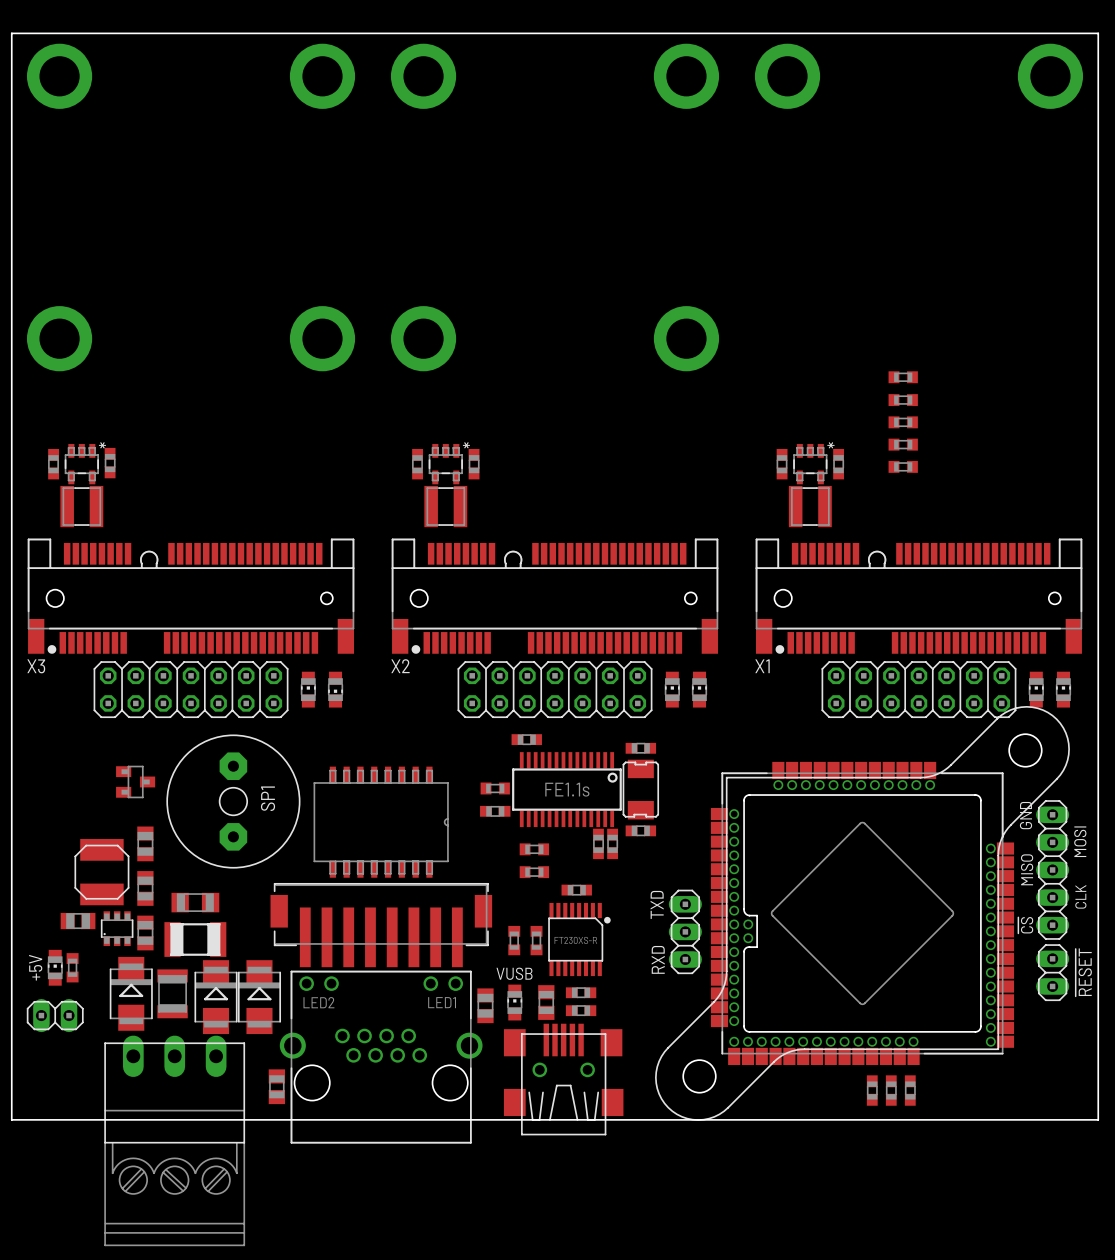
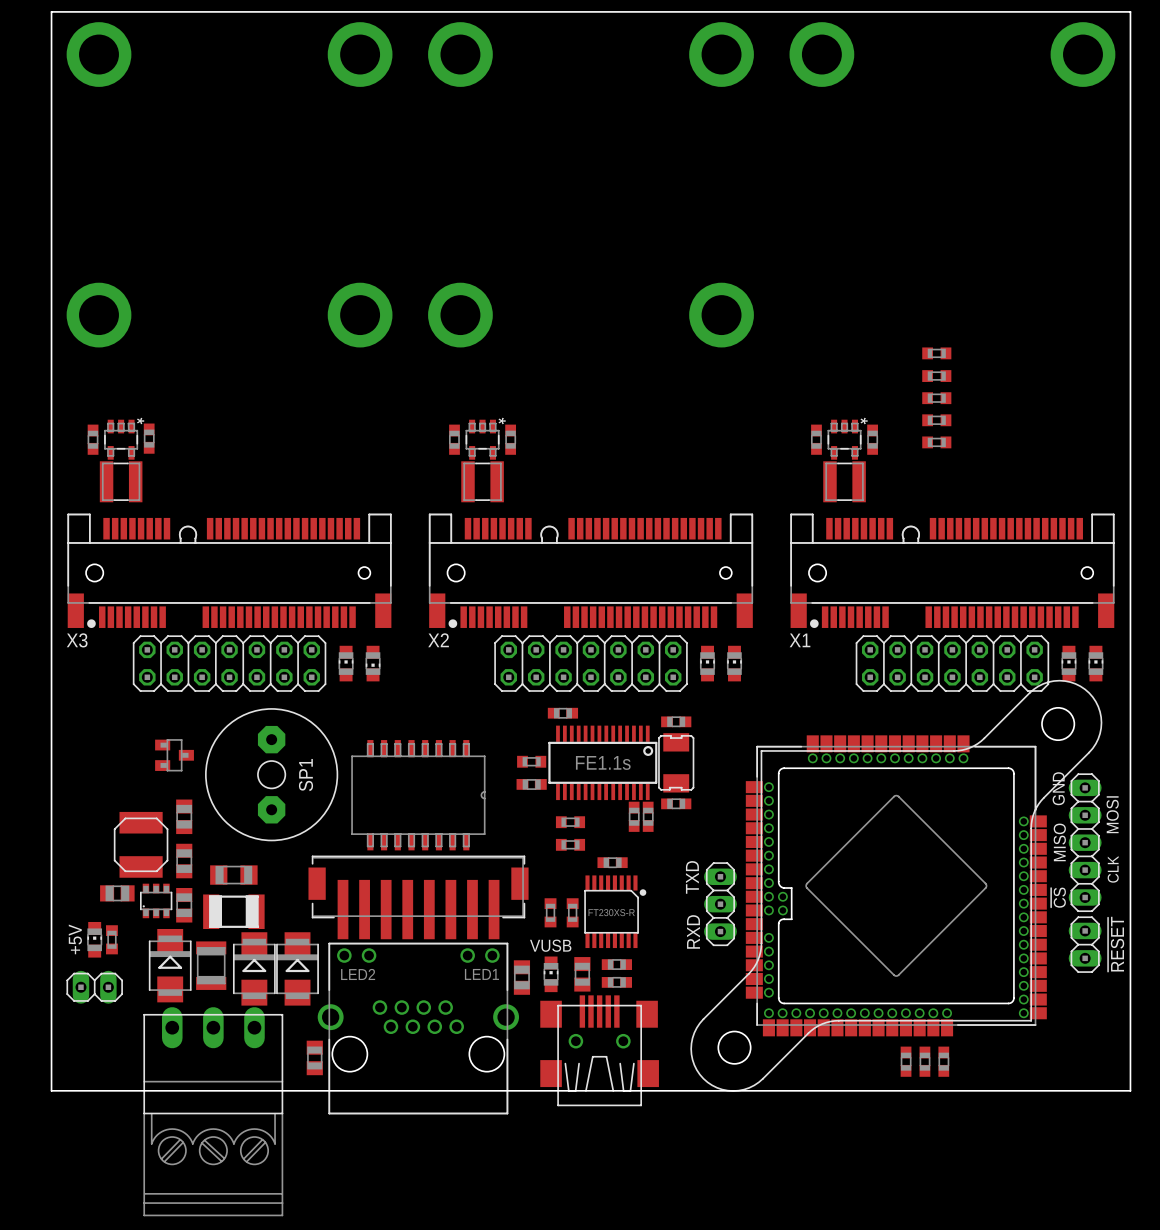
part footprint: [710, 761, 1015, 1066] -> [745, 735, 1047, 1037]

